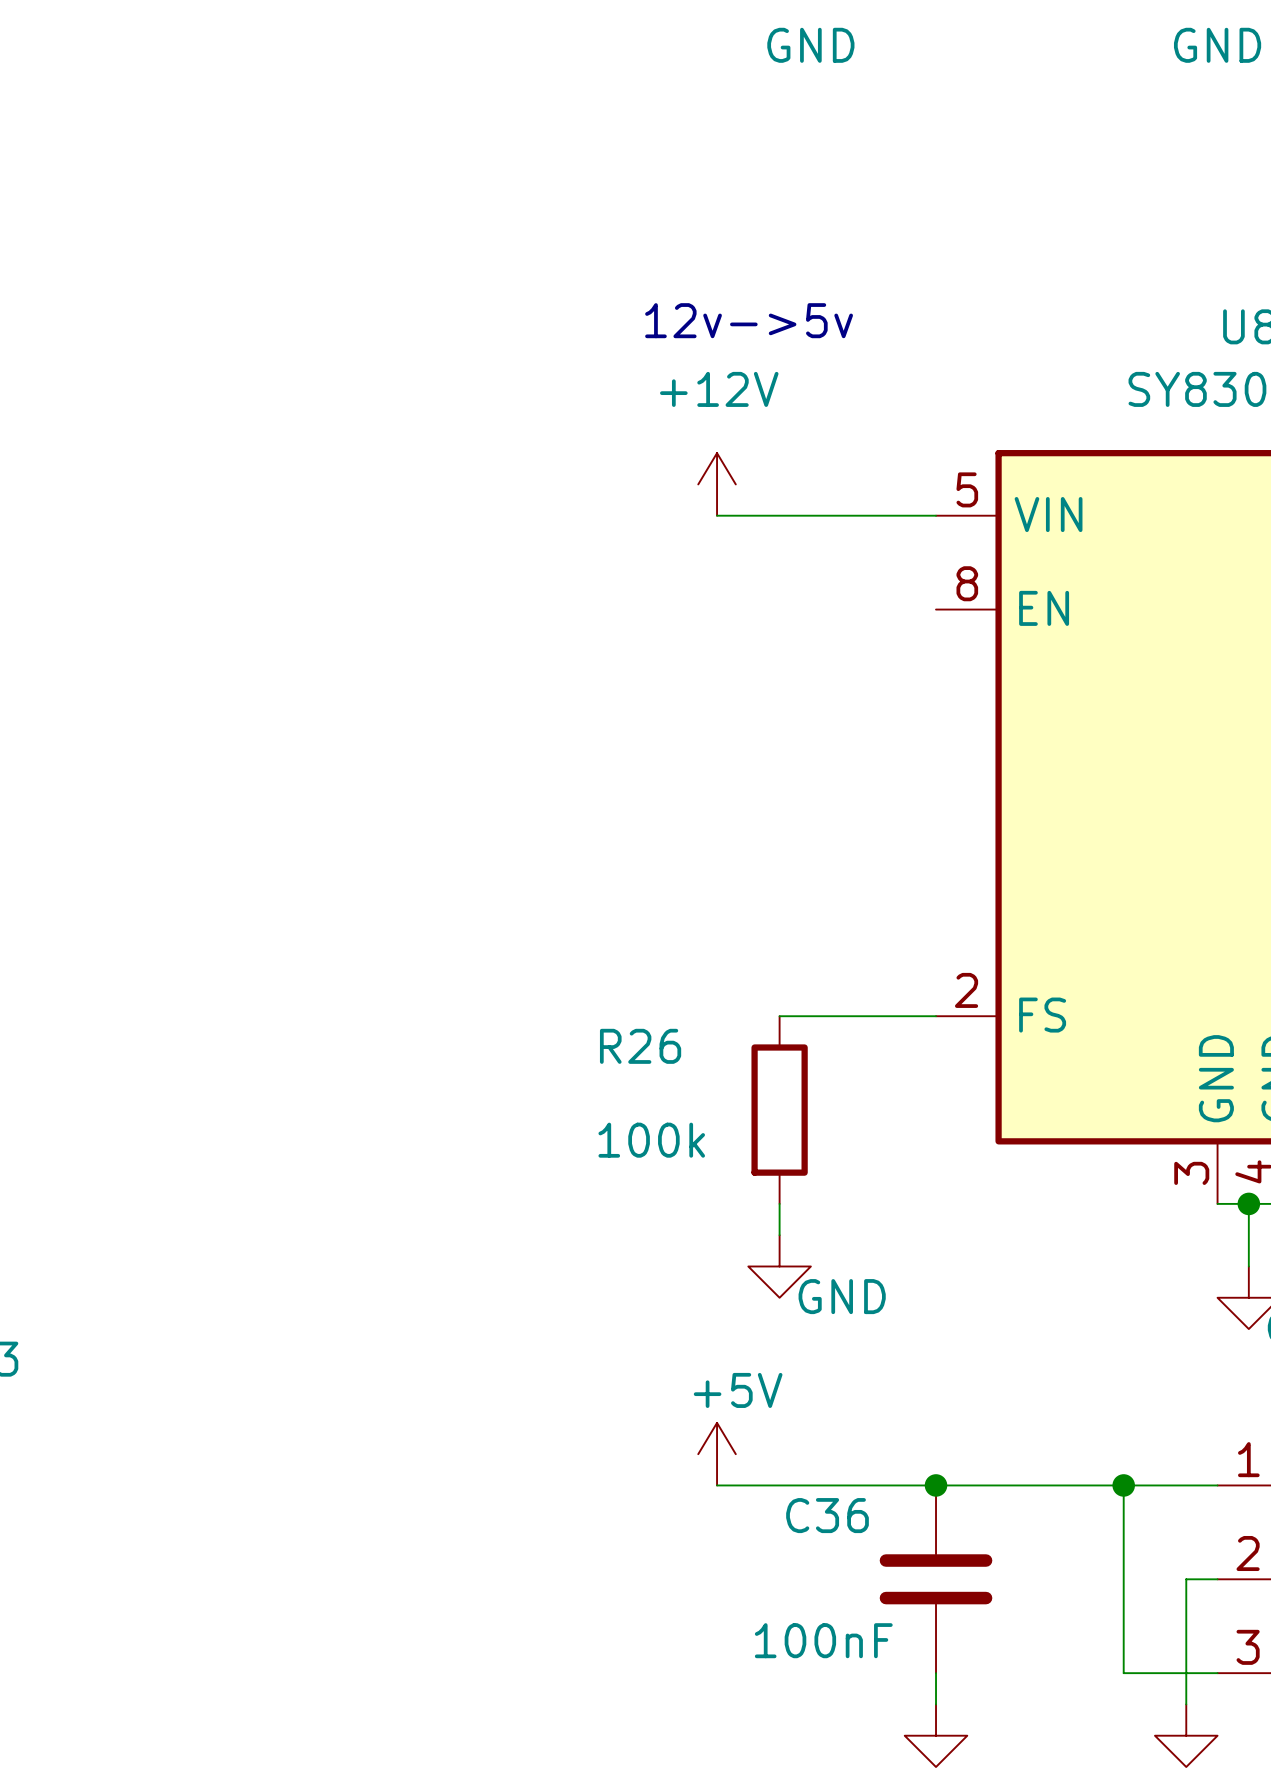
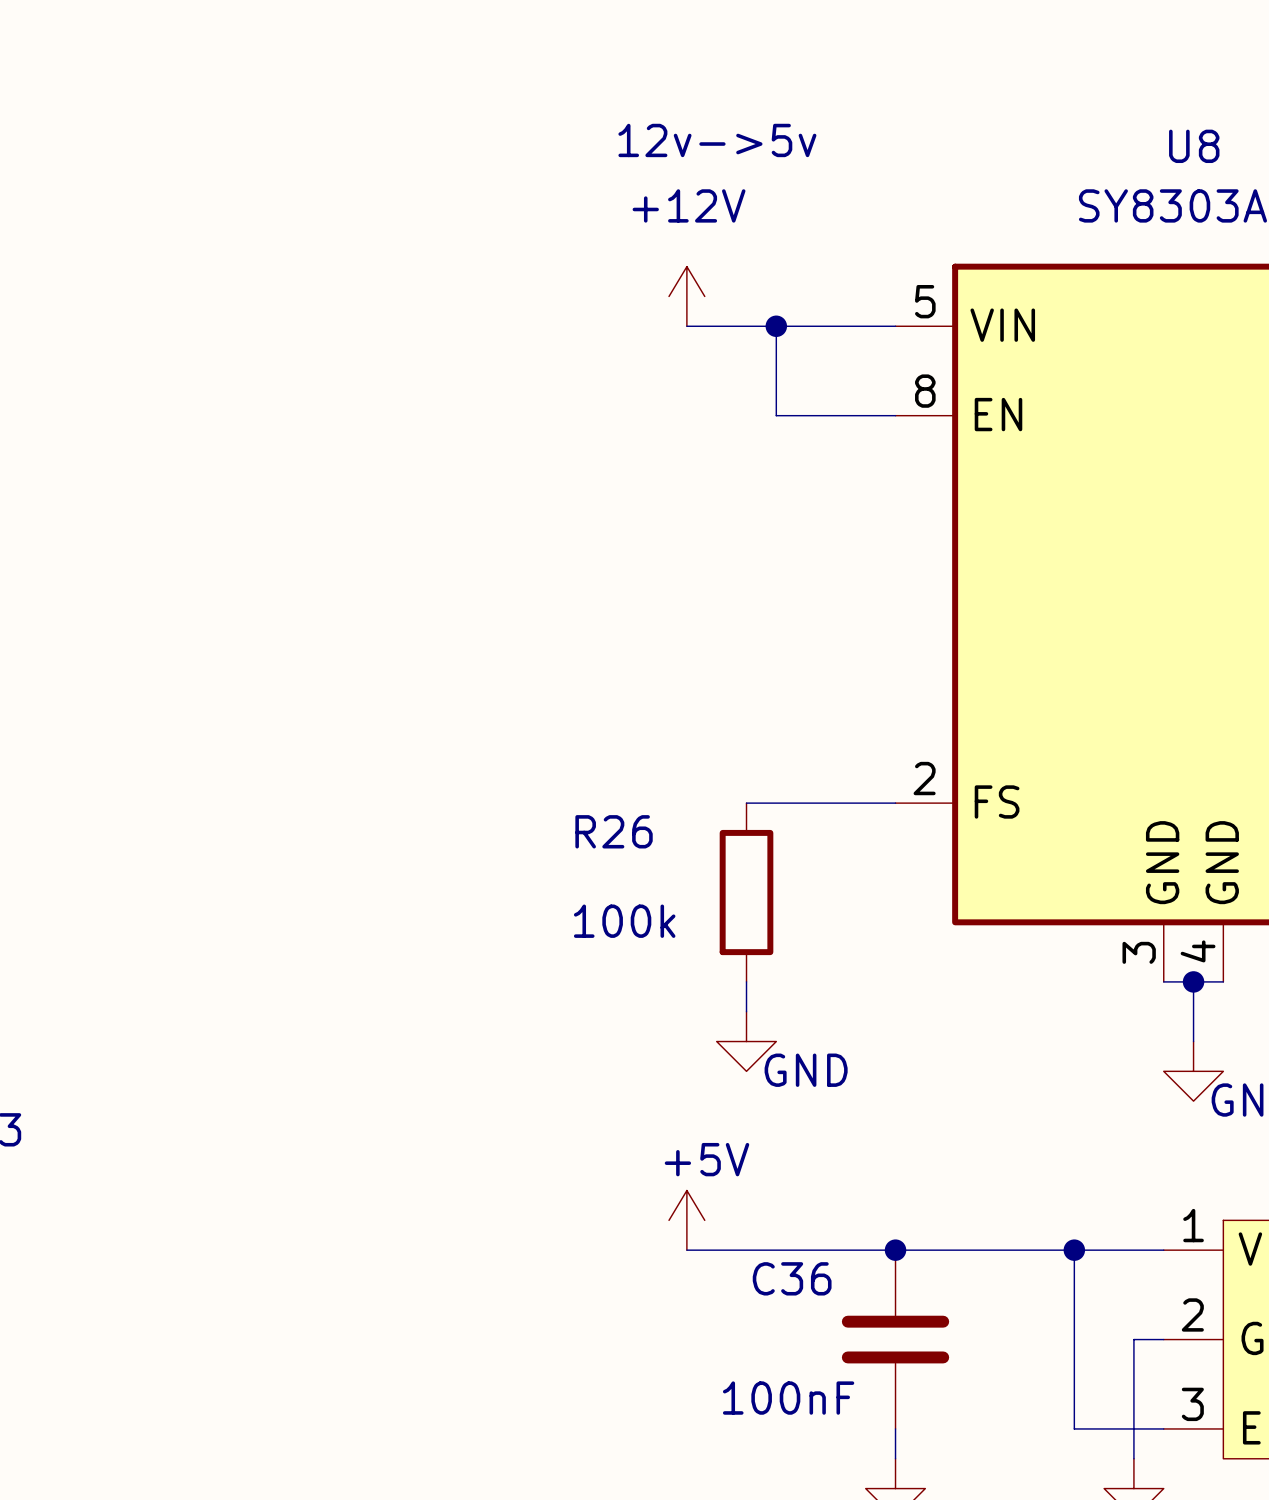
wire: none -> (776, 326) (776, 415) (895, 415)
junction: none -> (776, 326)

